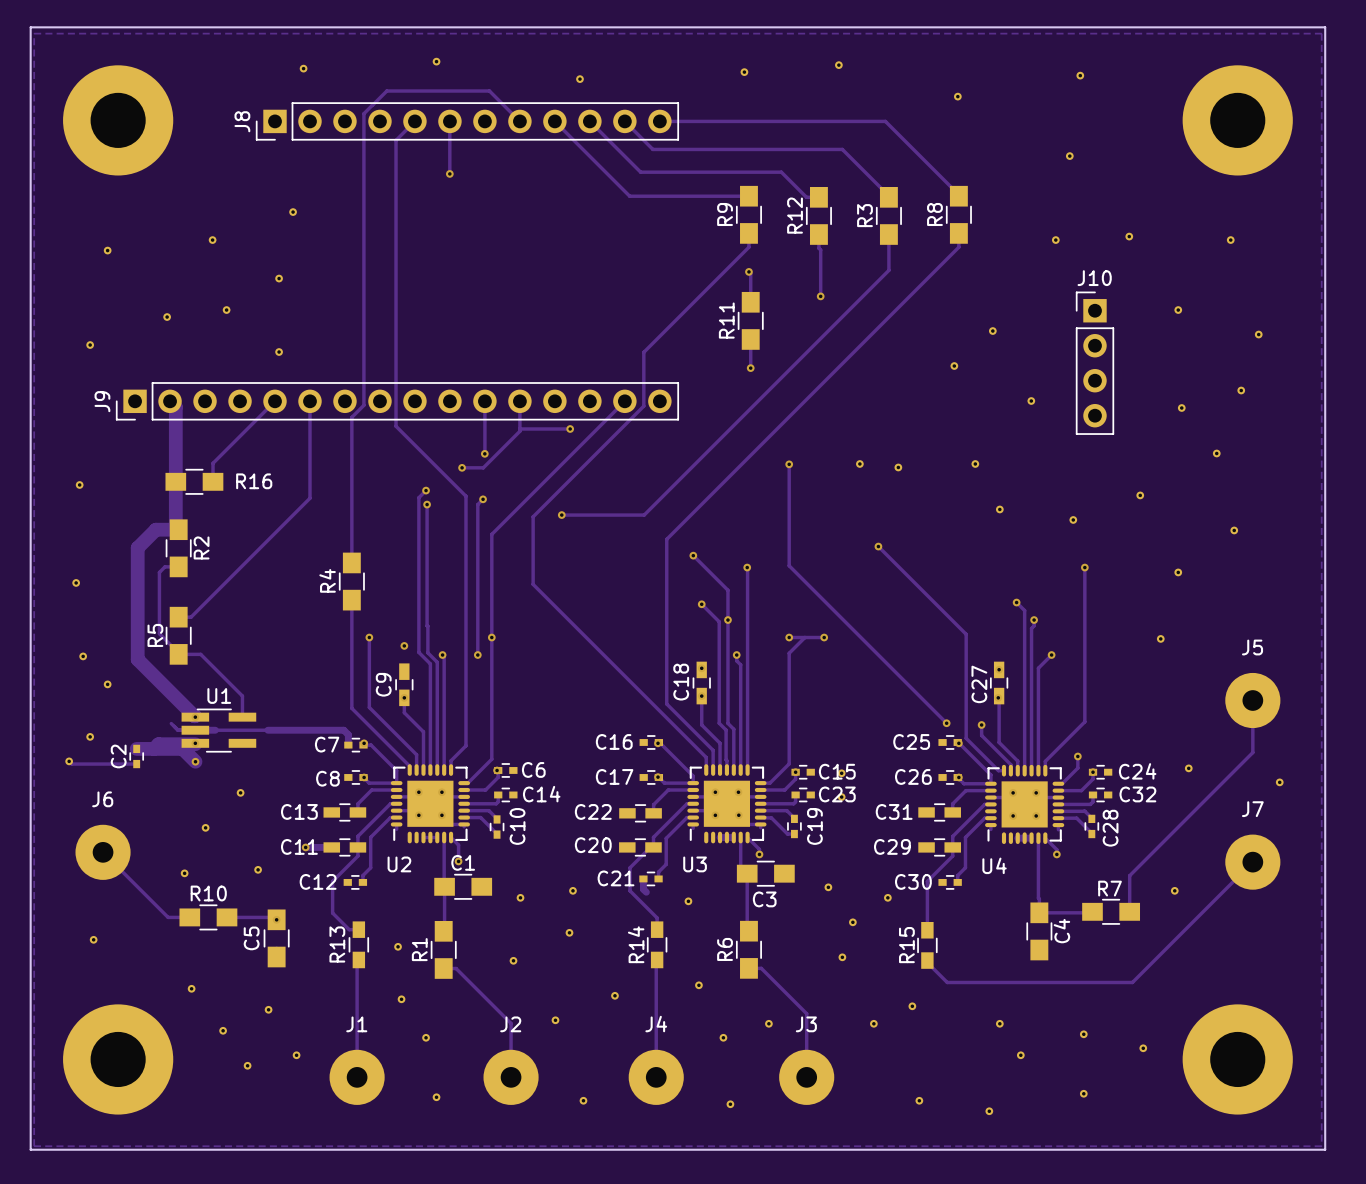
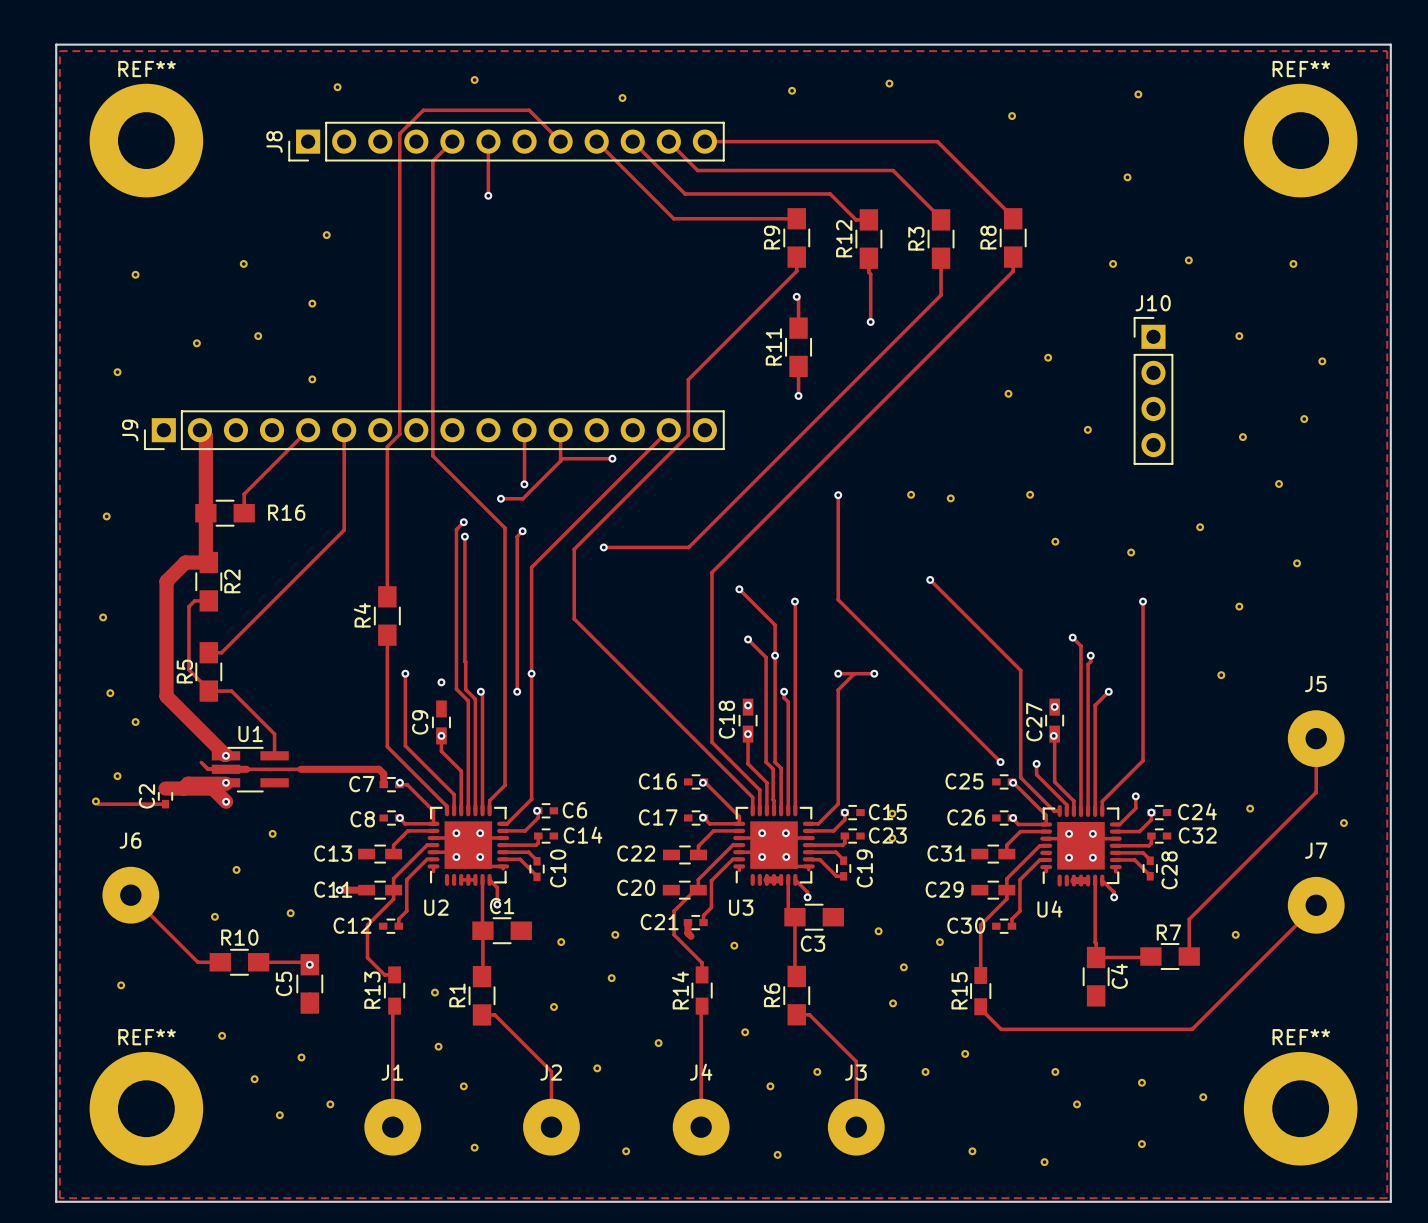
REF** name: none -> REF** (147, 69)
REF** name: none -> REF** (1301, 69)
REF** name: none -> REF** (147, 1037)
REF** name: none -> REF** (1301, 1037)

